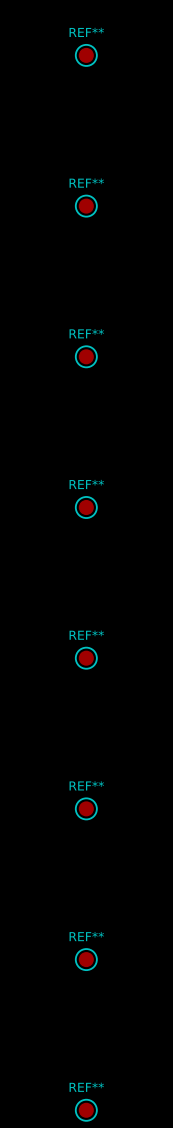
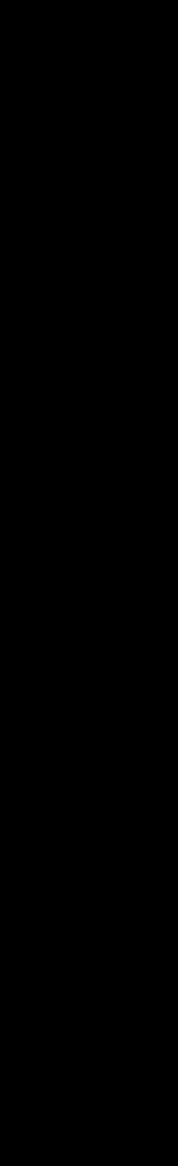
REF**: (86, 55) -> none
REF**: (86, 206) -> none
REF**: (86, 356) -> none
REF**: (86, 507) -> none
REF**: (86, 658) -> none
REF**: (86, 808) -> none
REF**: (86, 959) -> none
REF**: (86, 1110) -> none

